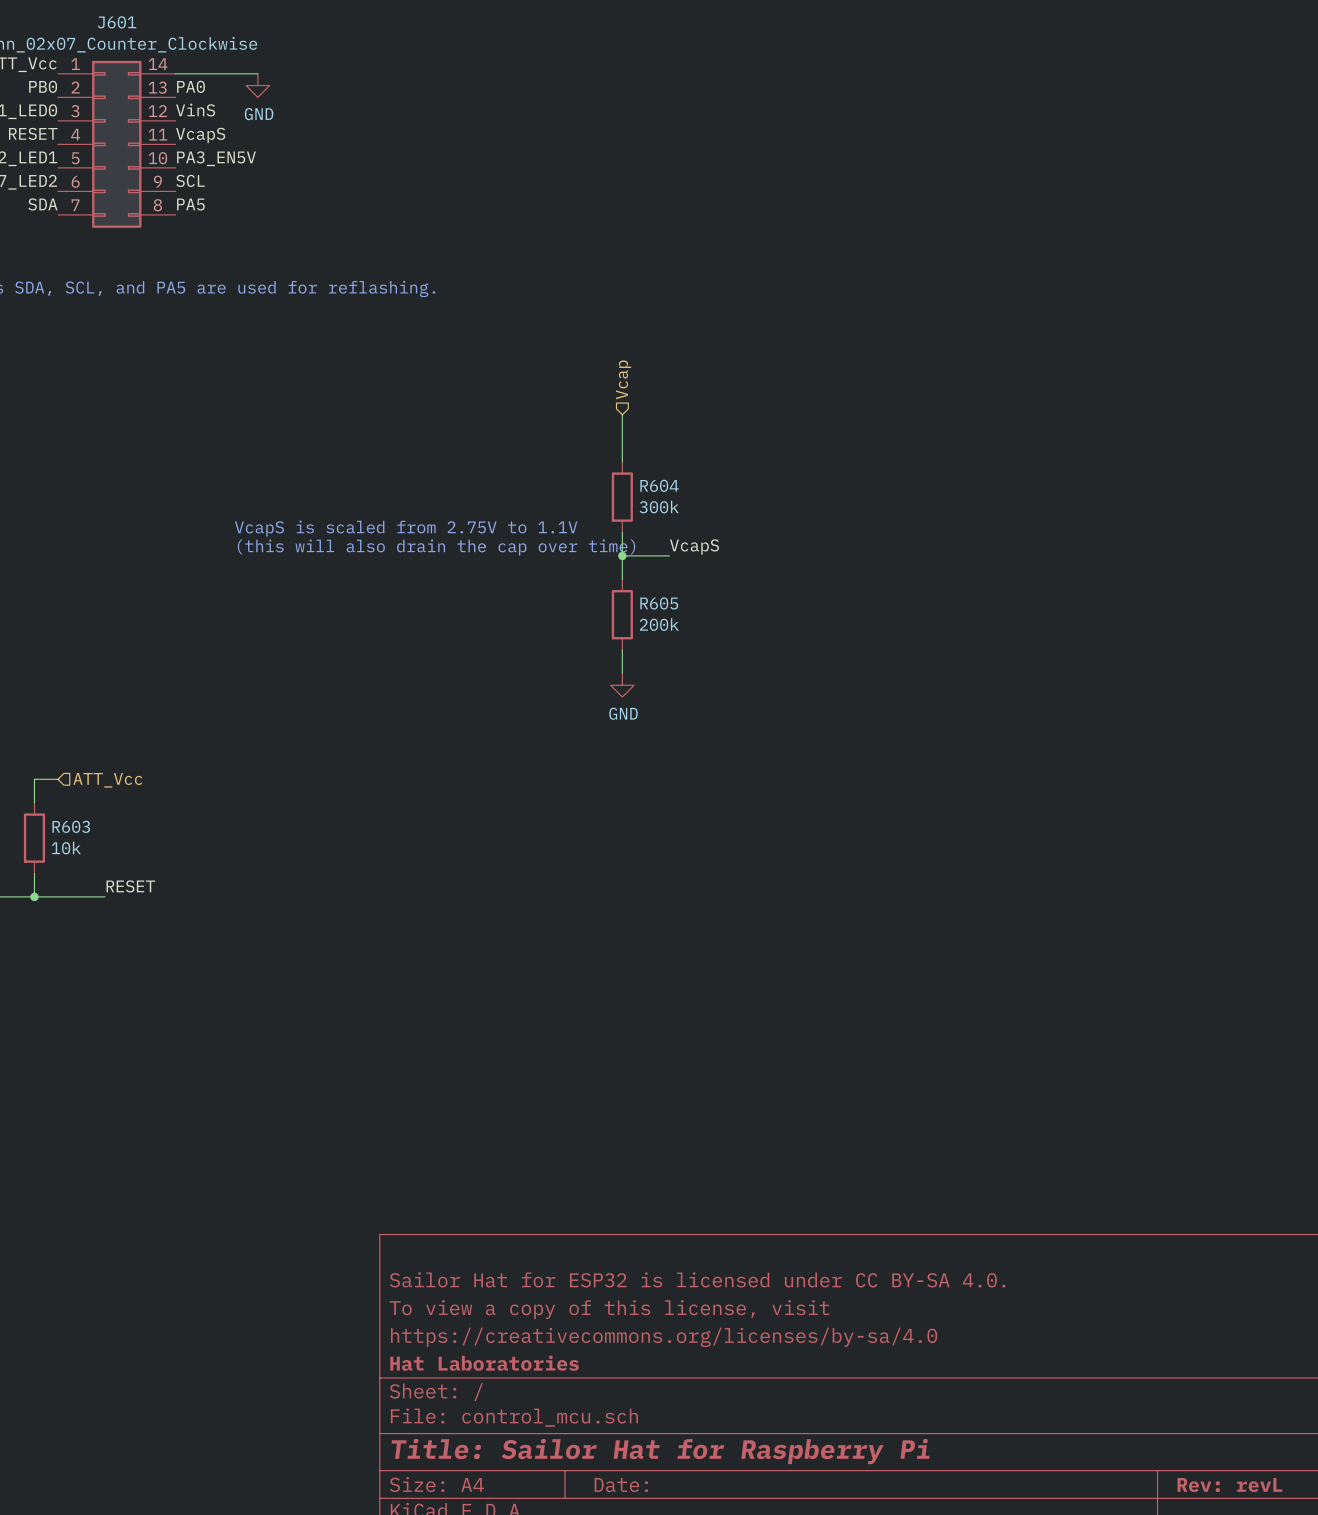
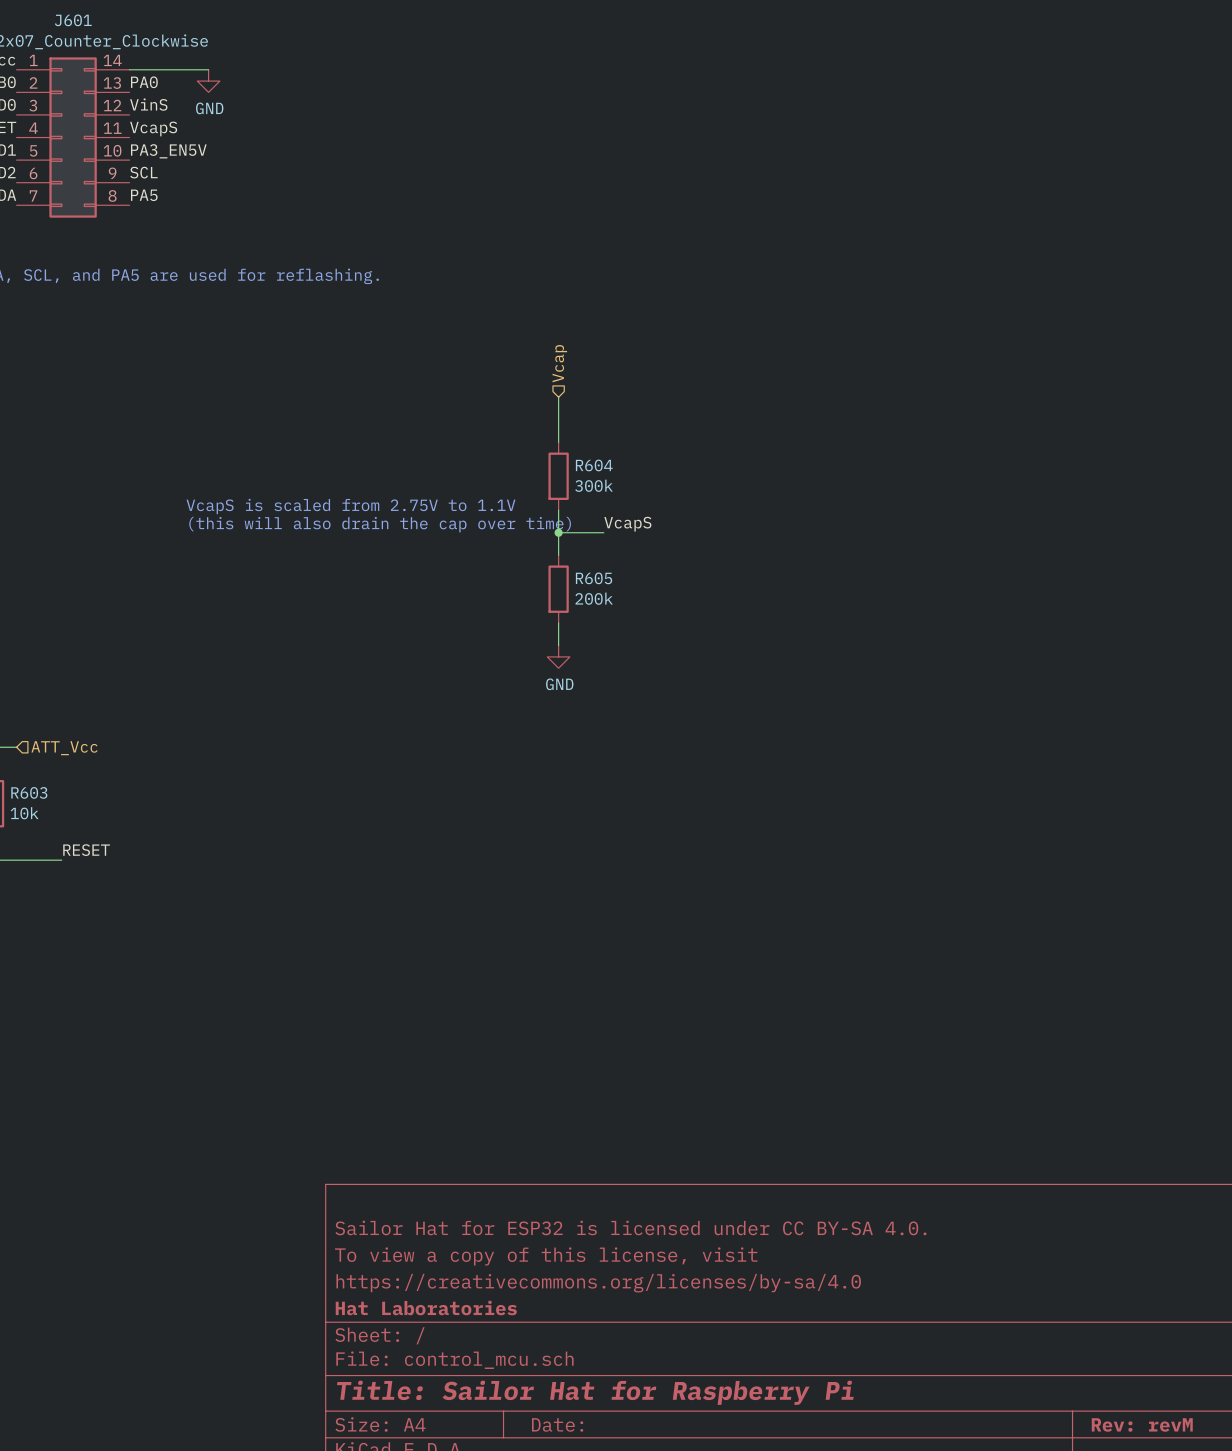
title block: Rev: revL (1229, 1485) -> Rev: revM (1142, 1424)

